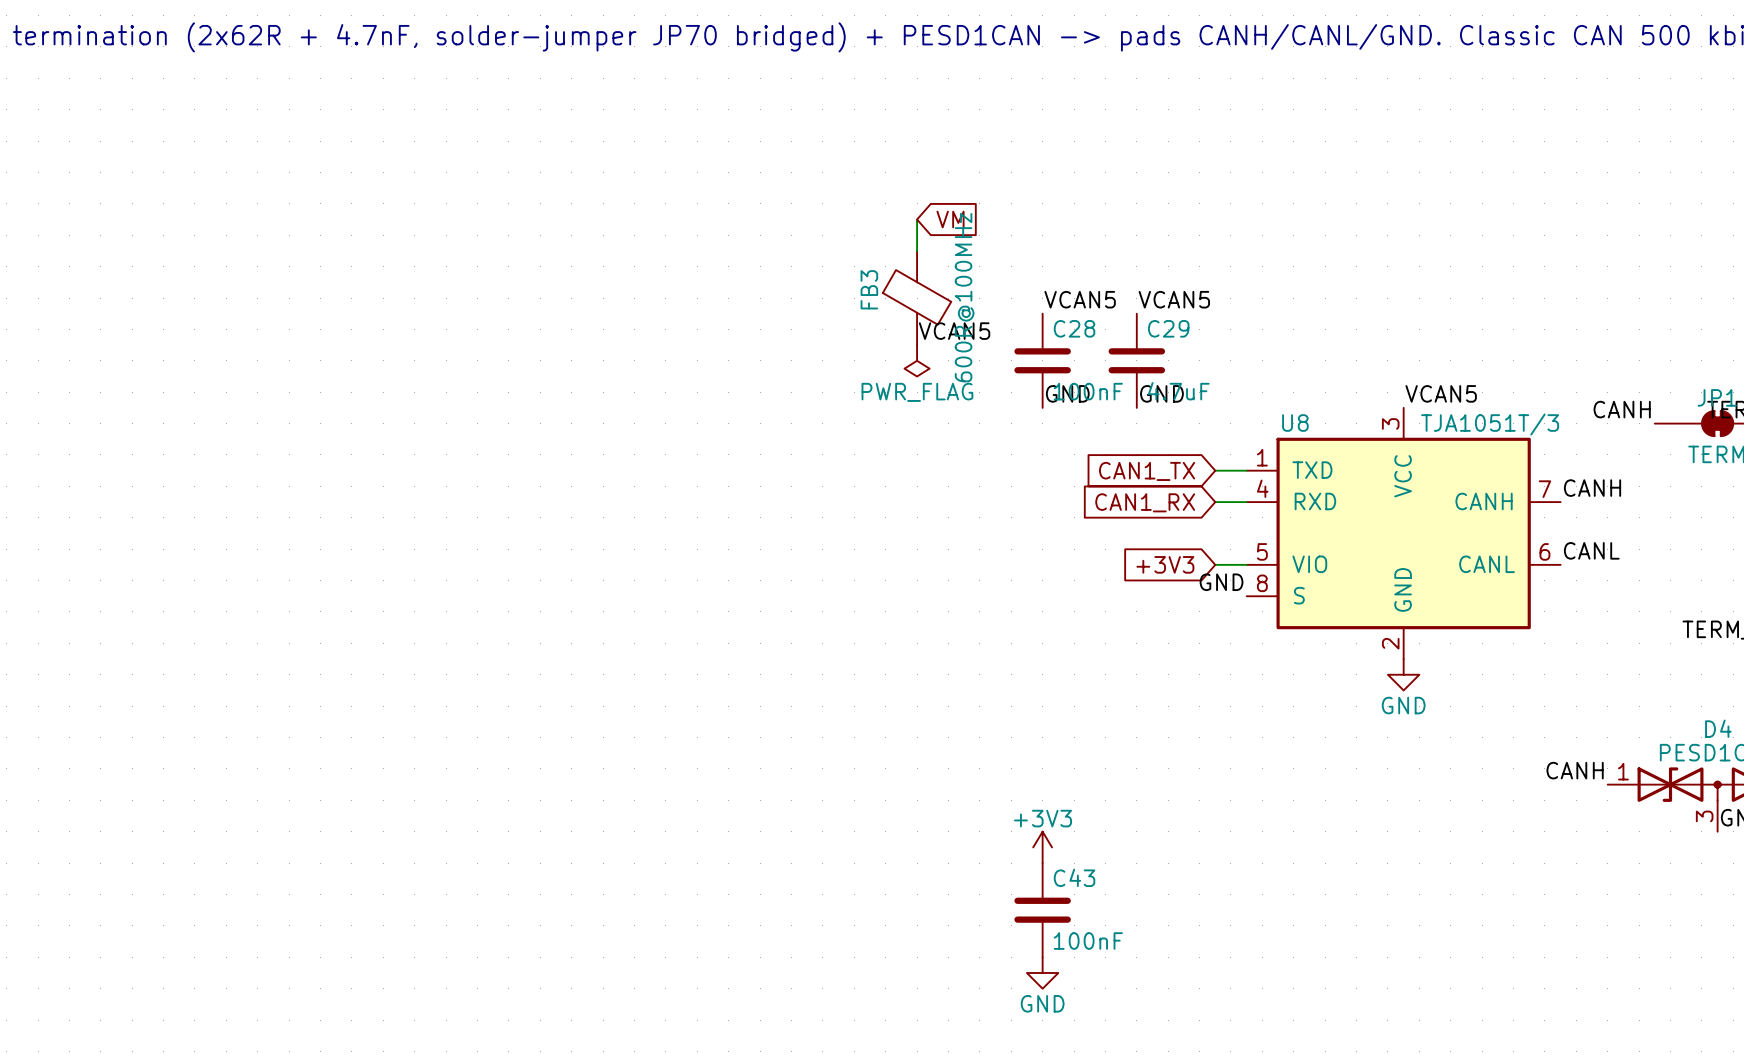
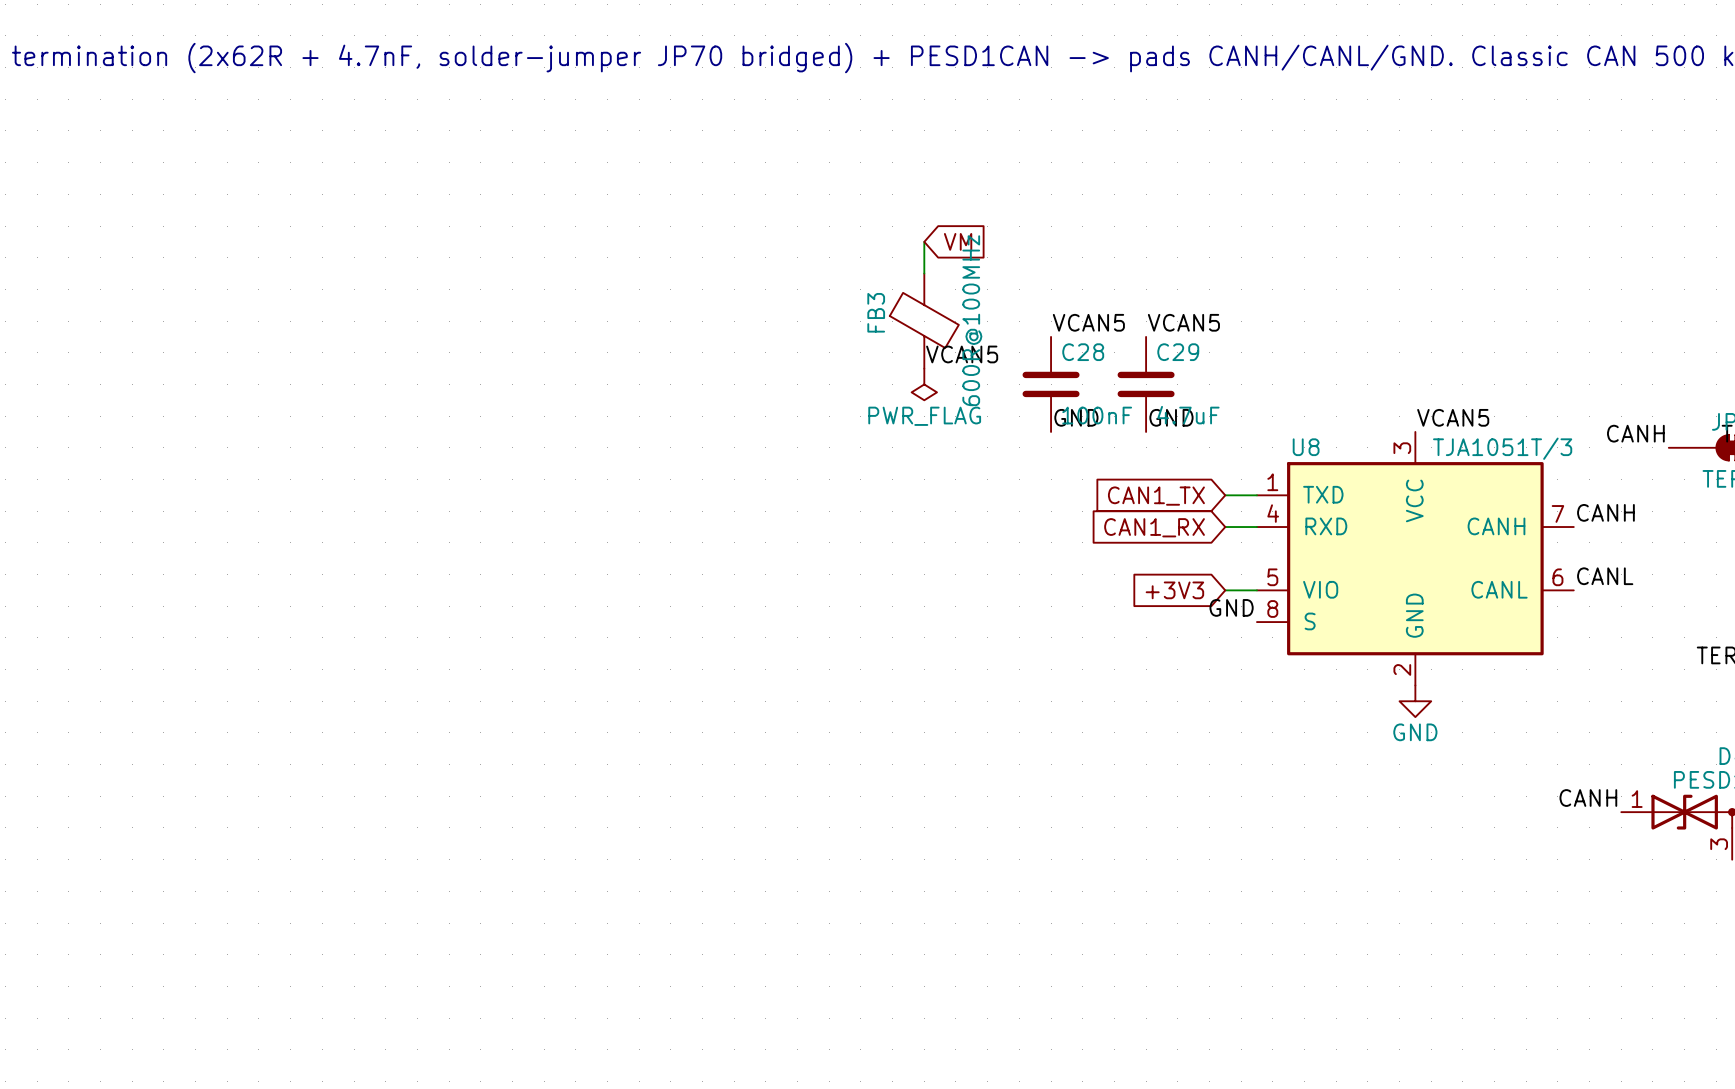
power symbol: +3V3 (1042, 847) -> none
C43: 100nF (1042, 910) -> none
power symbol: GND (1042, 972) -> none

